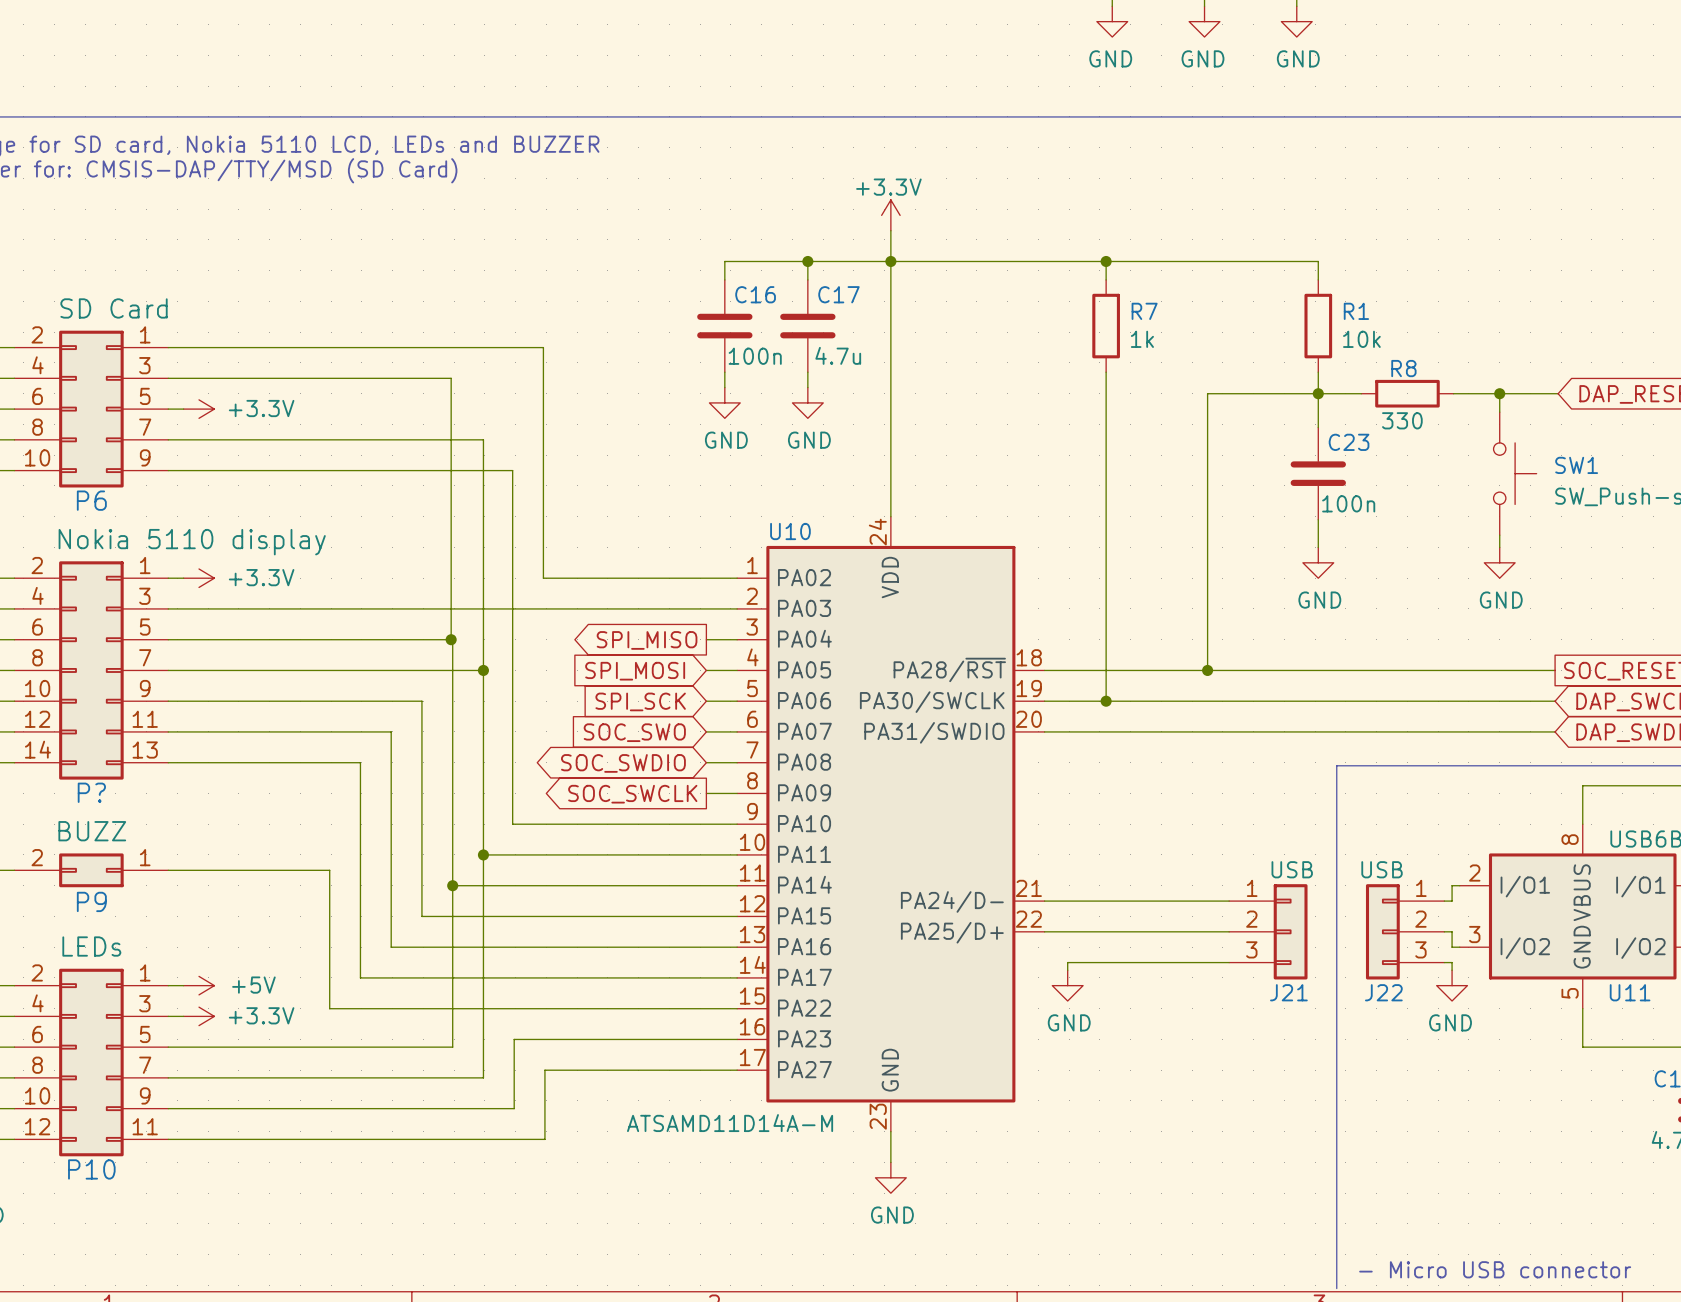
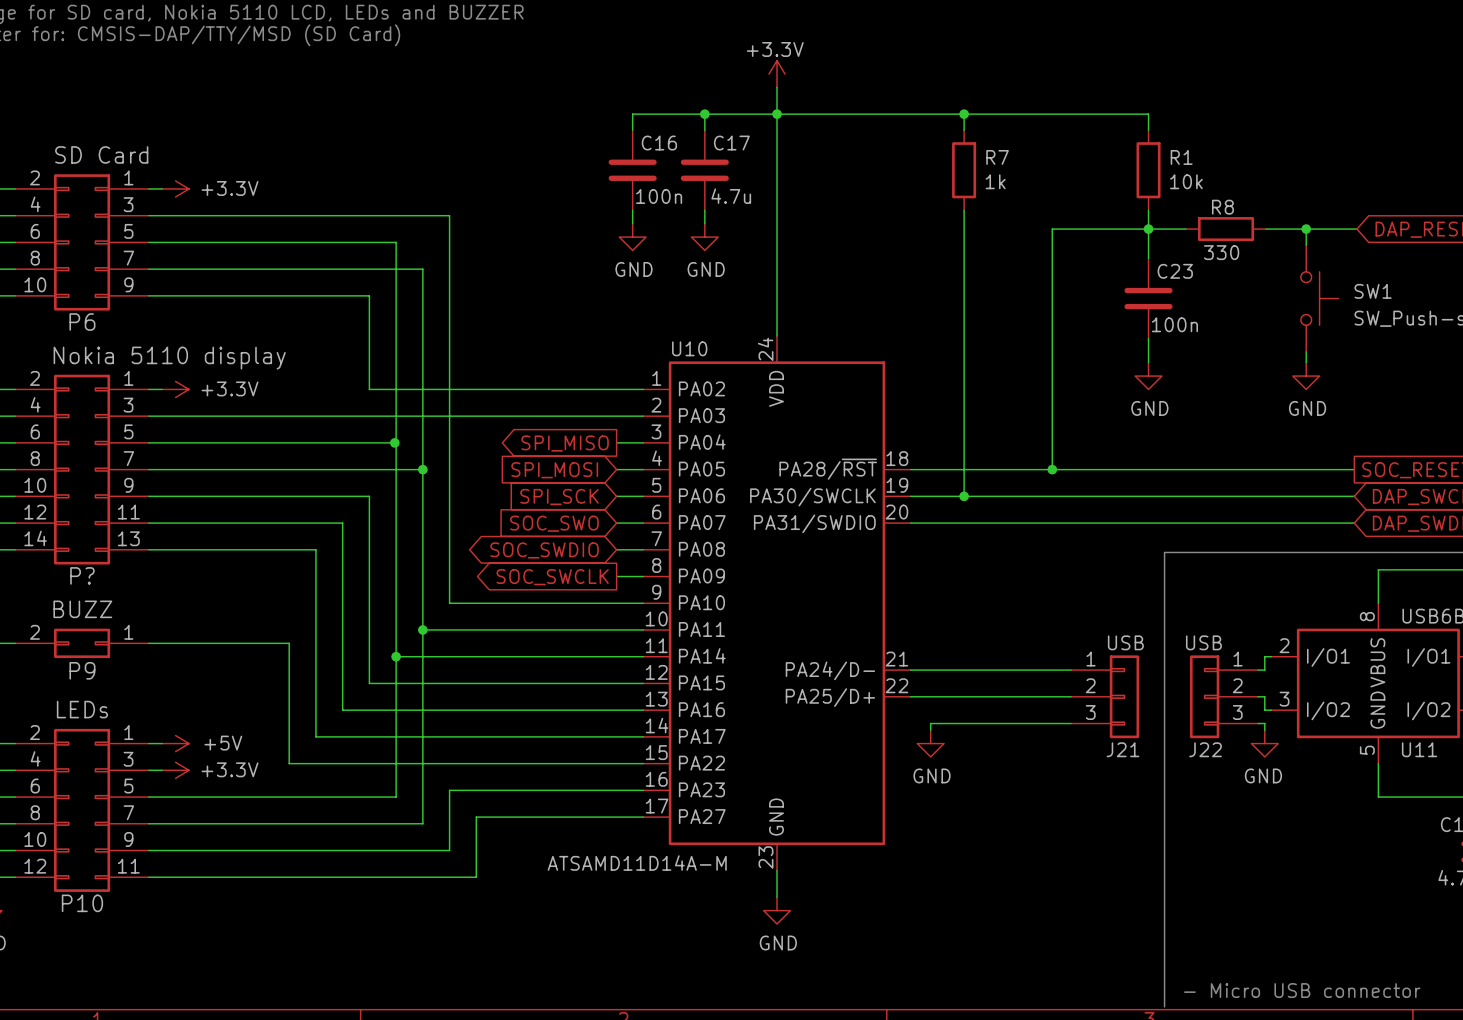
wire: (183, 347) (543, 347) (543, 578) -> (369, 295) (369, 389) (474, 389)
wire: (451, 378) (451, 639) -> none
wire: none -> (162, 242) (396, 242) (396, 442)
power symbol position: +3.3V (199, 409) -> +3.3V (175, 188)
wire: (421, 470) (512, 470) (512, 824) (514, 824) -> (394, 215) (449, 215) (449, 603)

